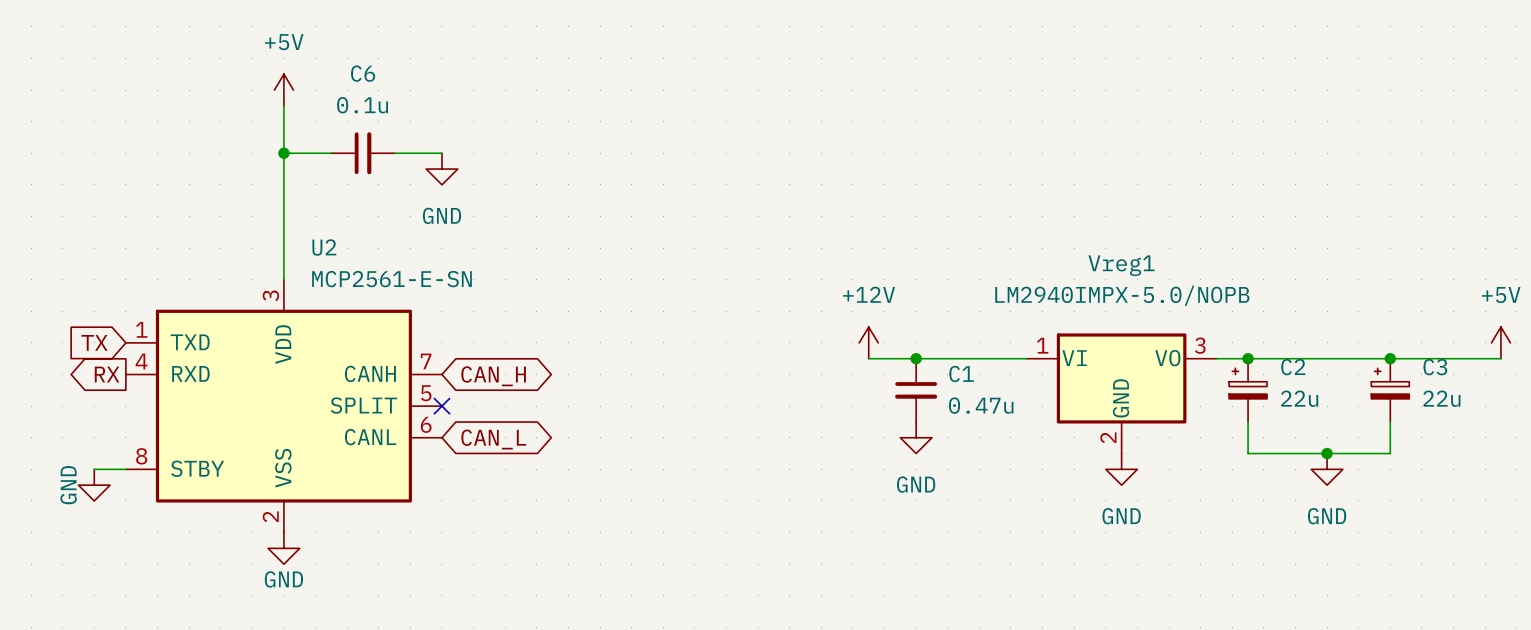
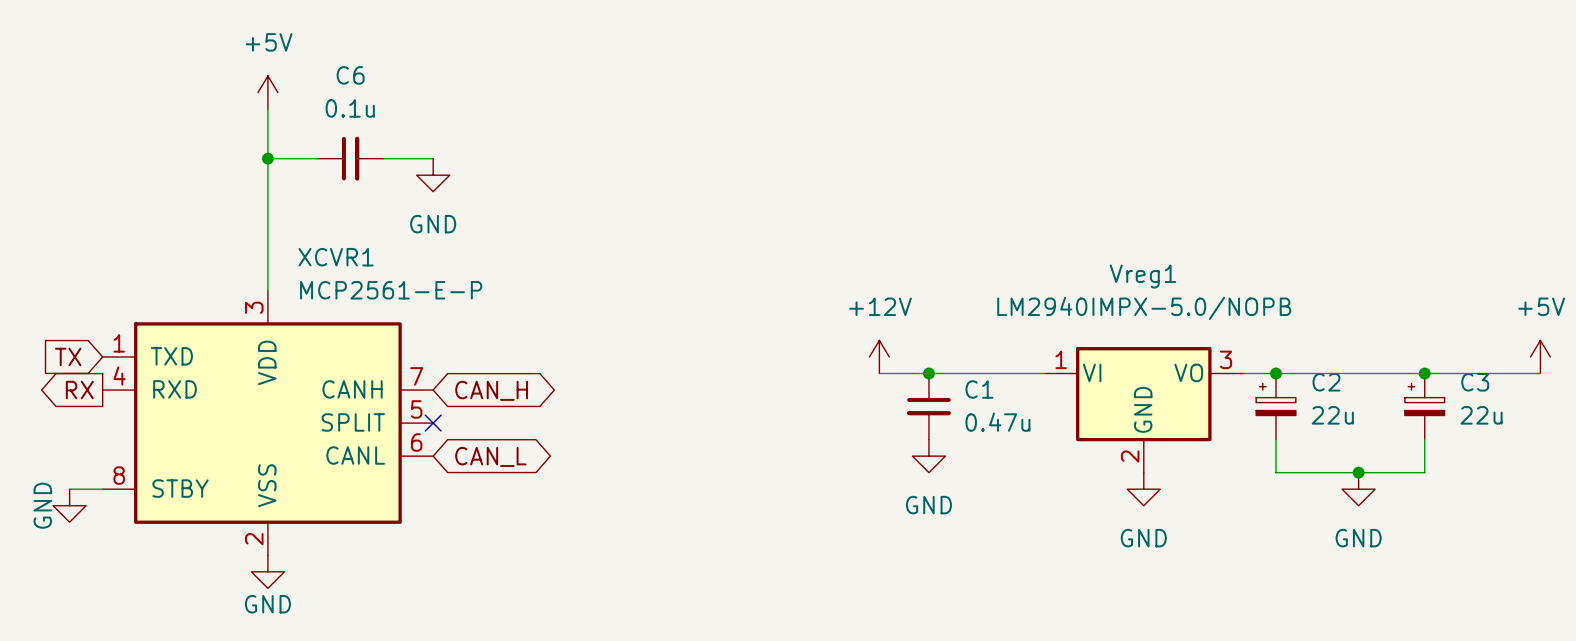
U2 name: U2 (324, 247) -> XCVR1 (336, 257)
U2 value: MCP2561-E-SN (391, 279) -> MCP2561-E-P (391, 290)

